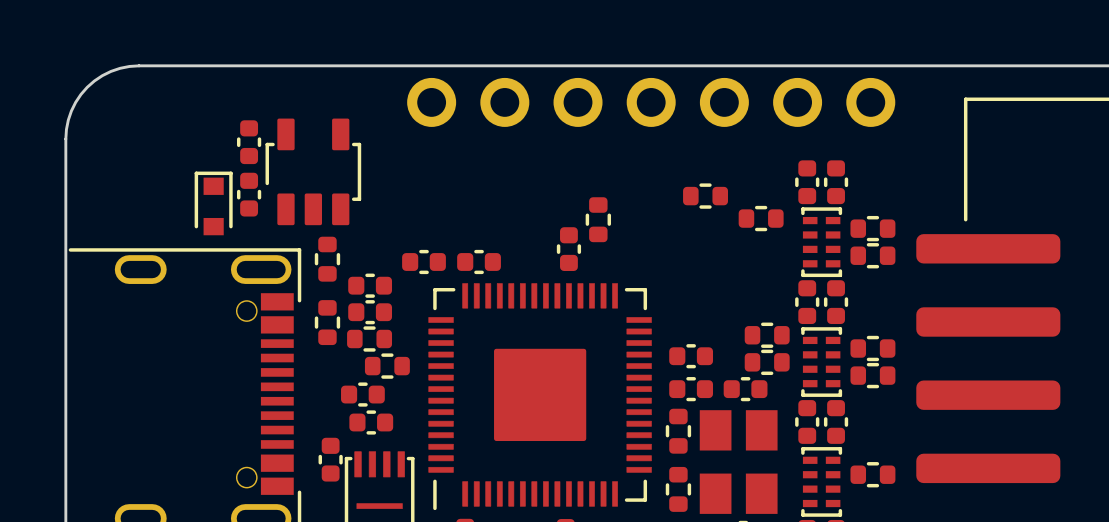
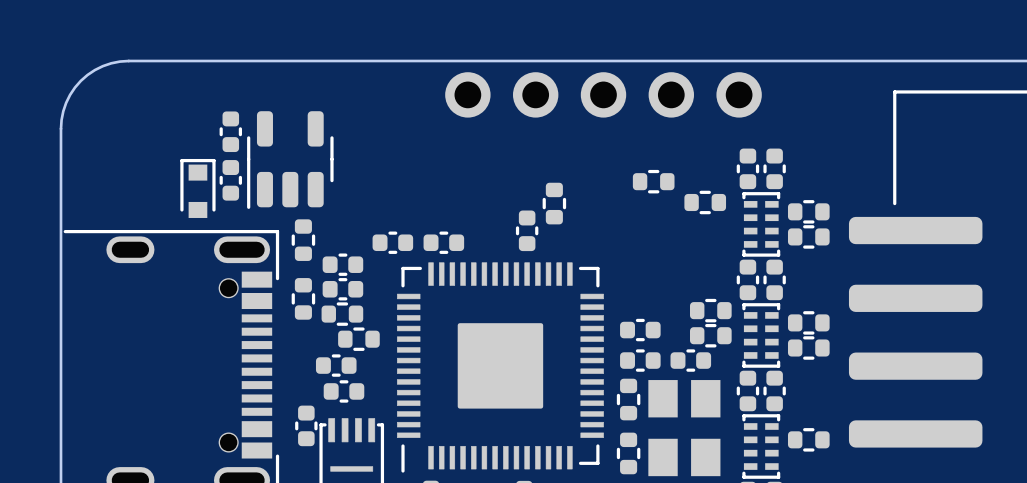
part footprint: [407, 77, 896, 127] -> [445, 72, 762, 118]
part footprint: [265, 118, 362, 226] -> [247, 111, 334, 209]

